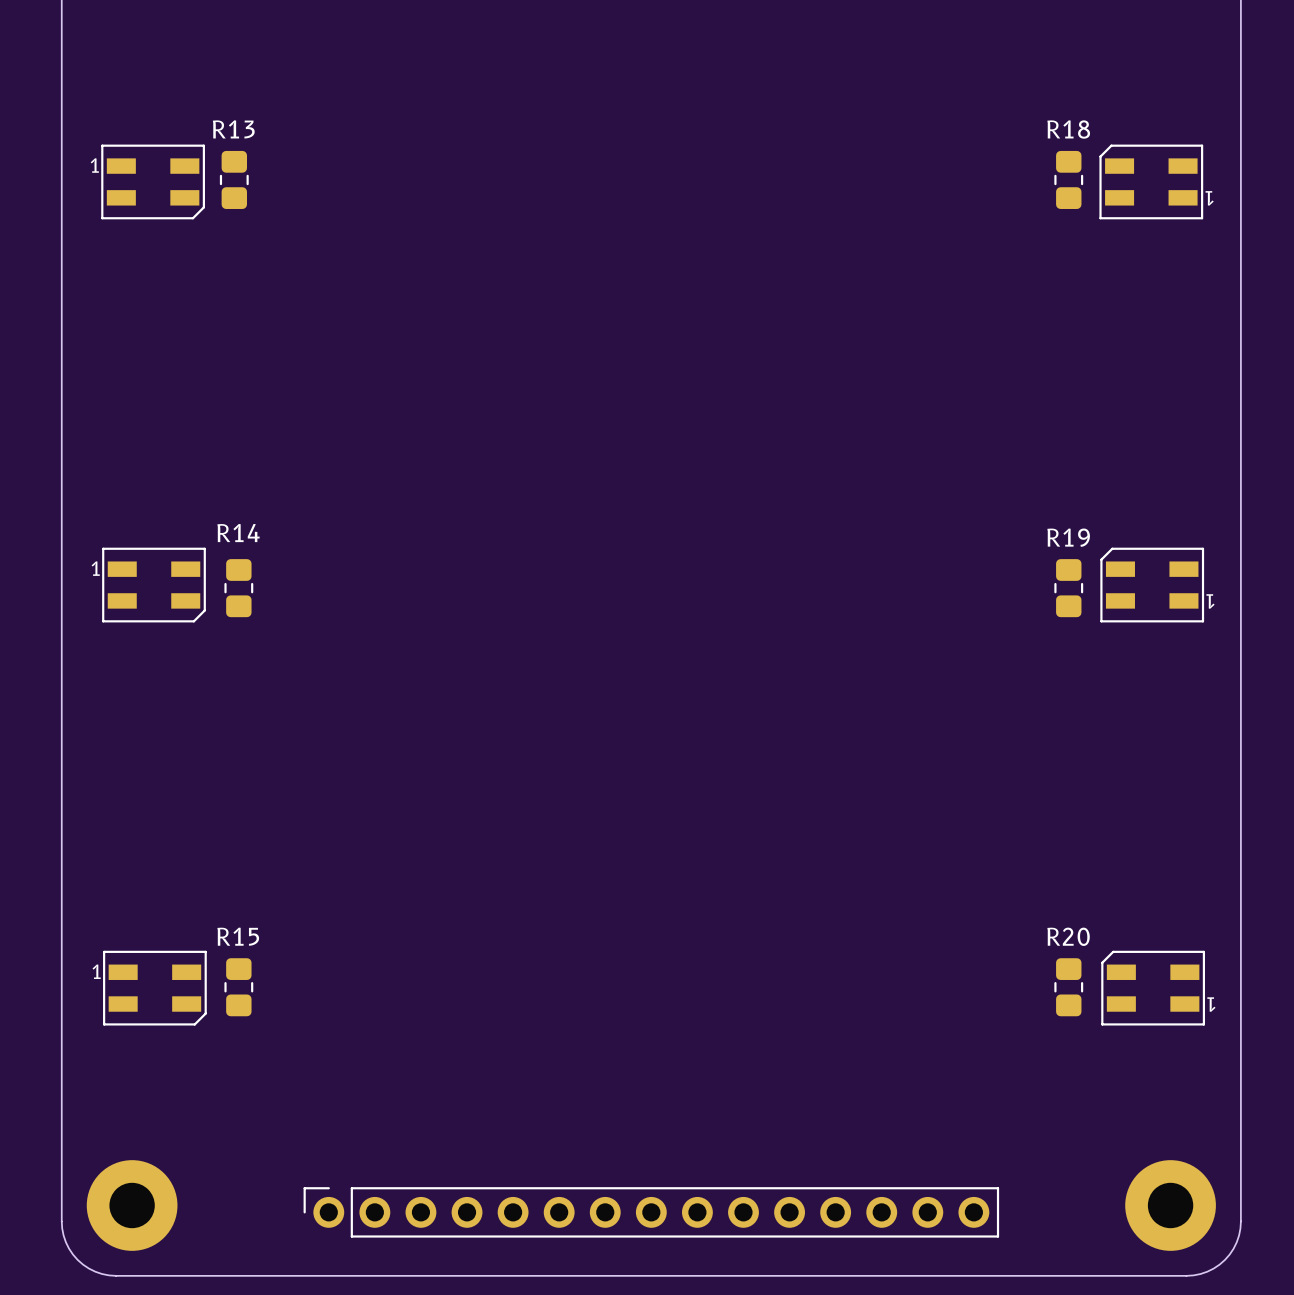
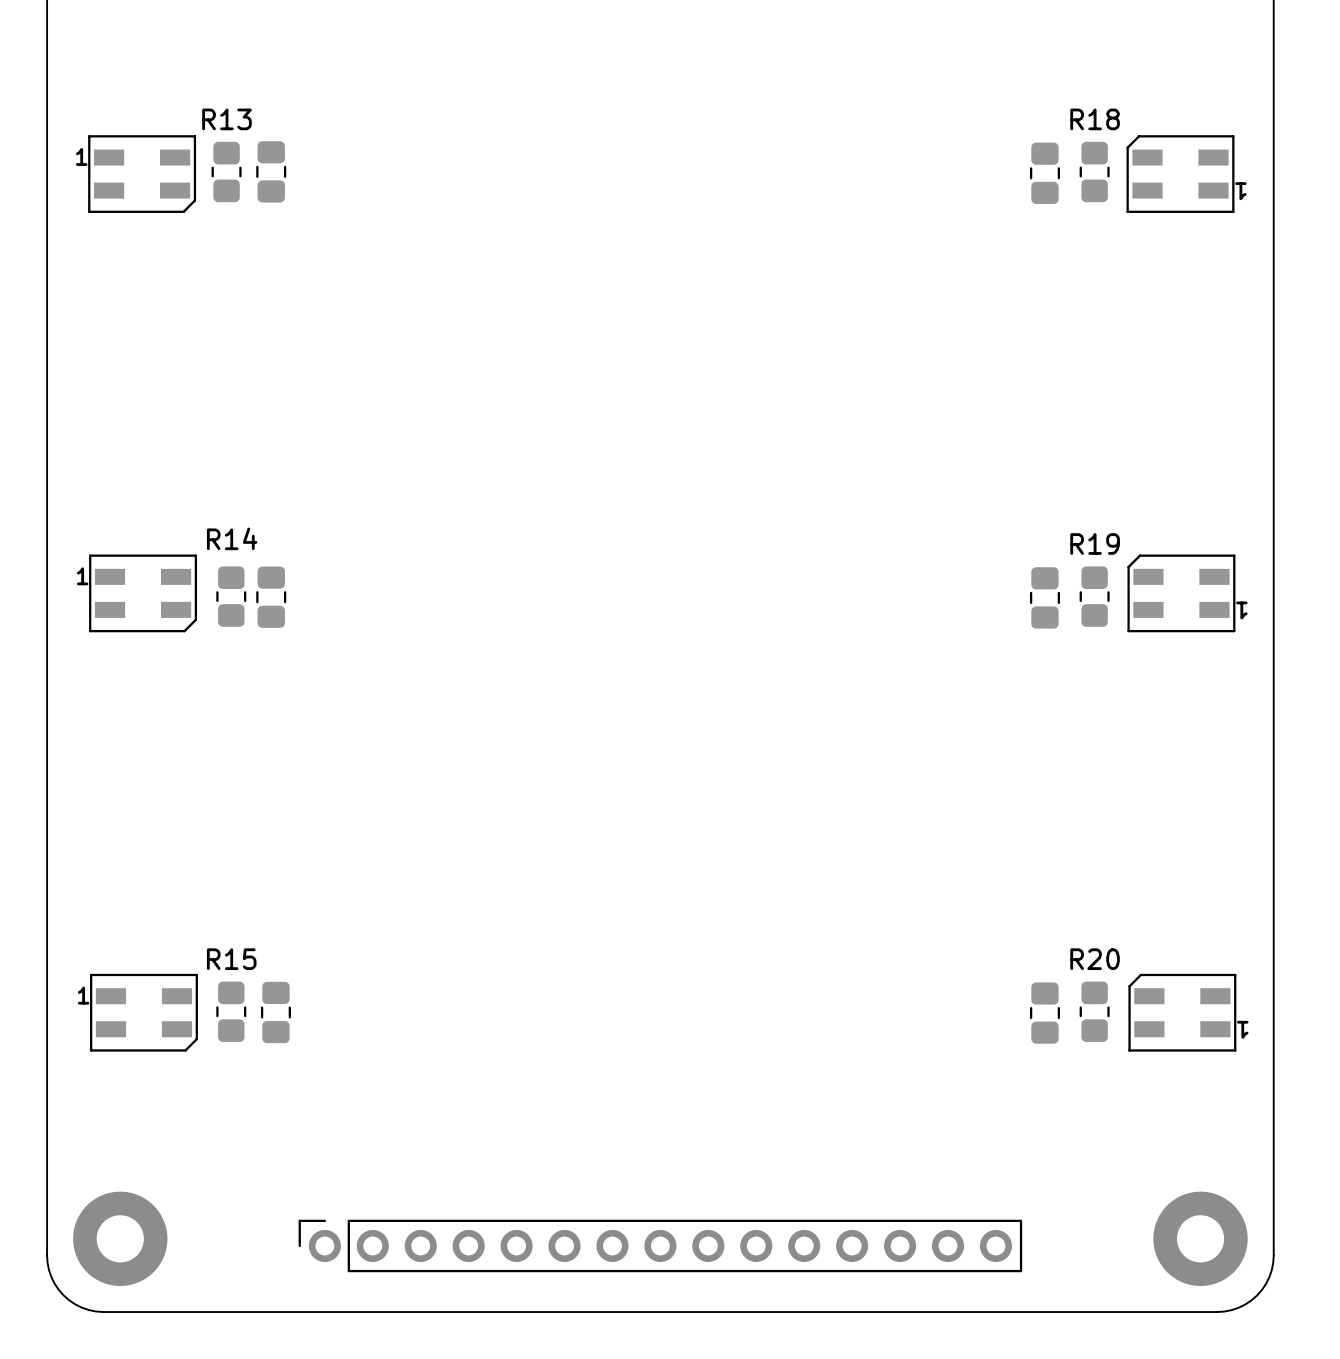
part: none -> (271, 171)
part: none -> (1044, 173)
part: none -> (271, 597)
part: none -> (1044, 597)
part: none -> (275, 1012)
part: none -> (1044, 1013)

